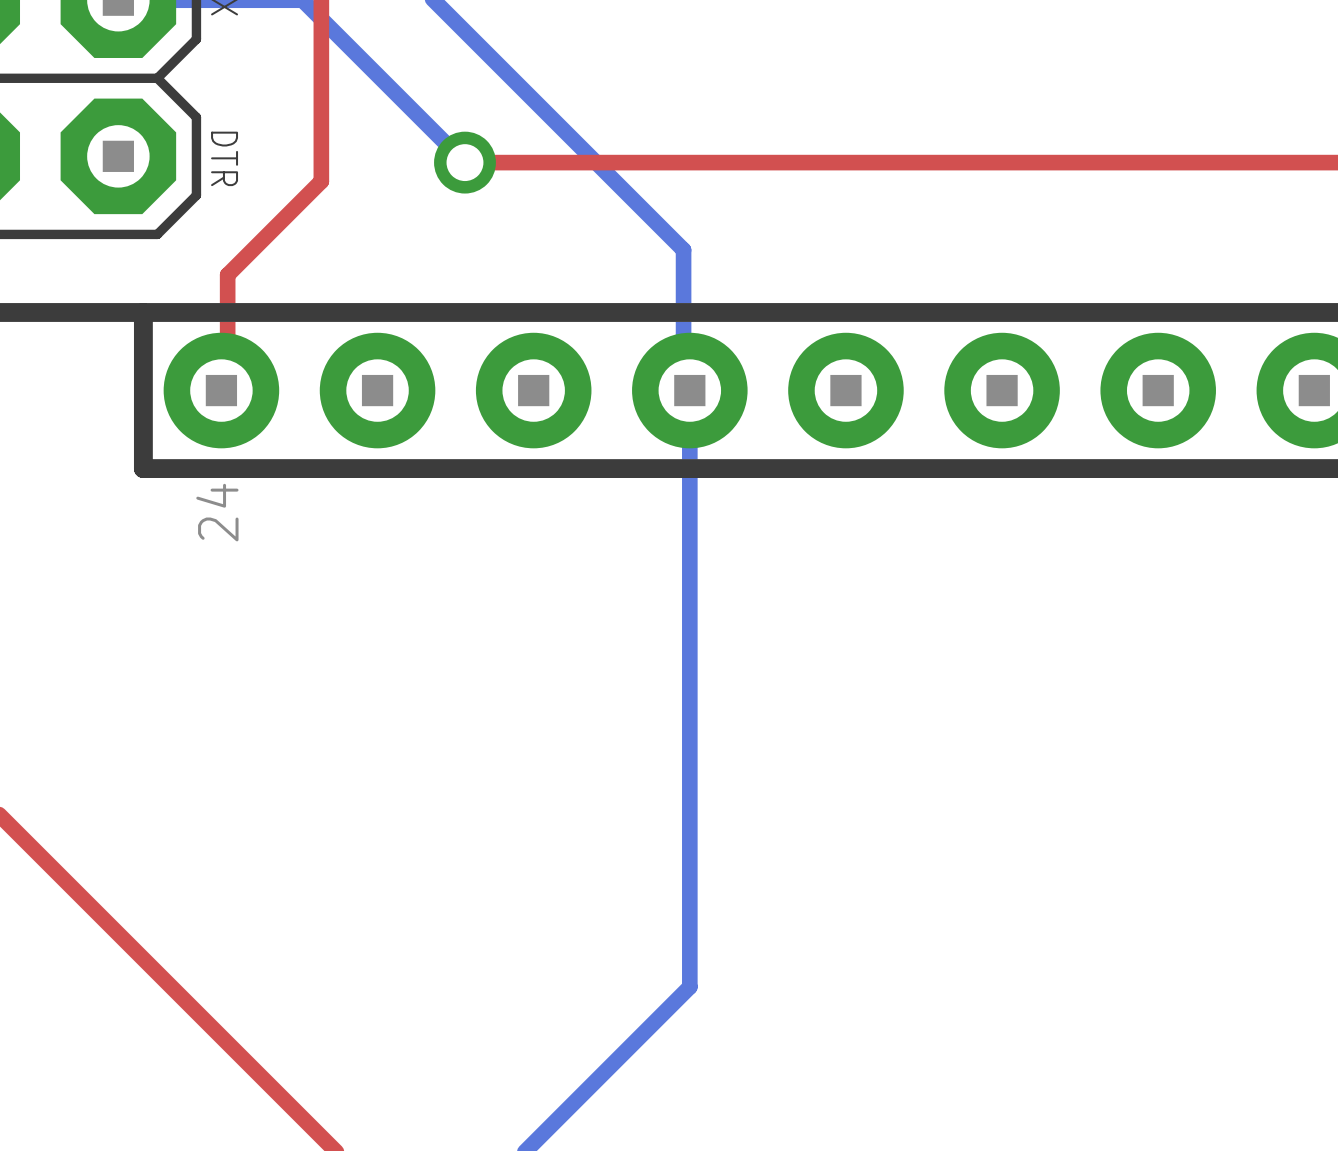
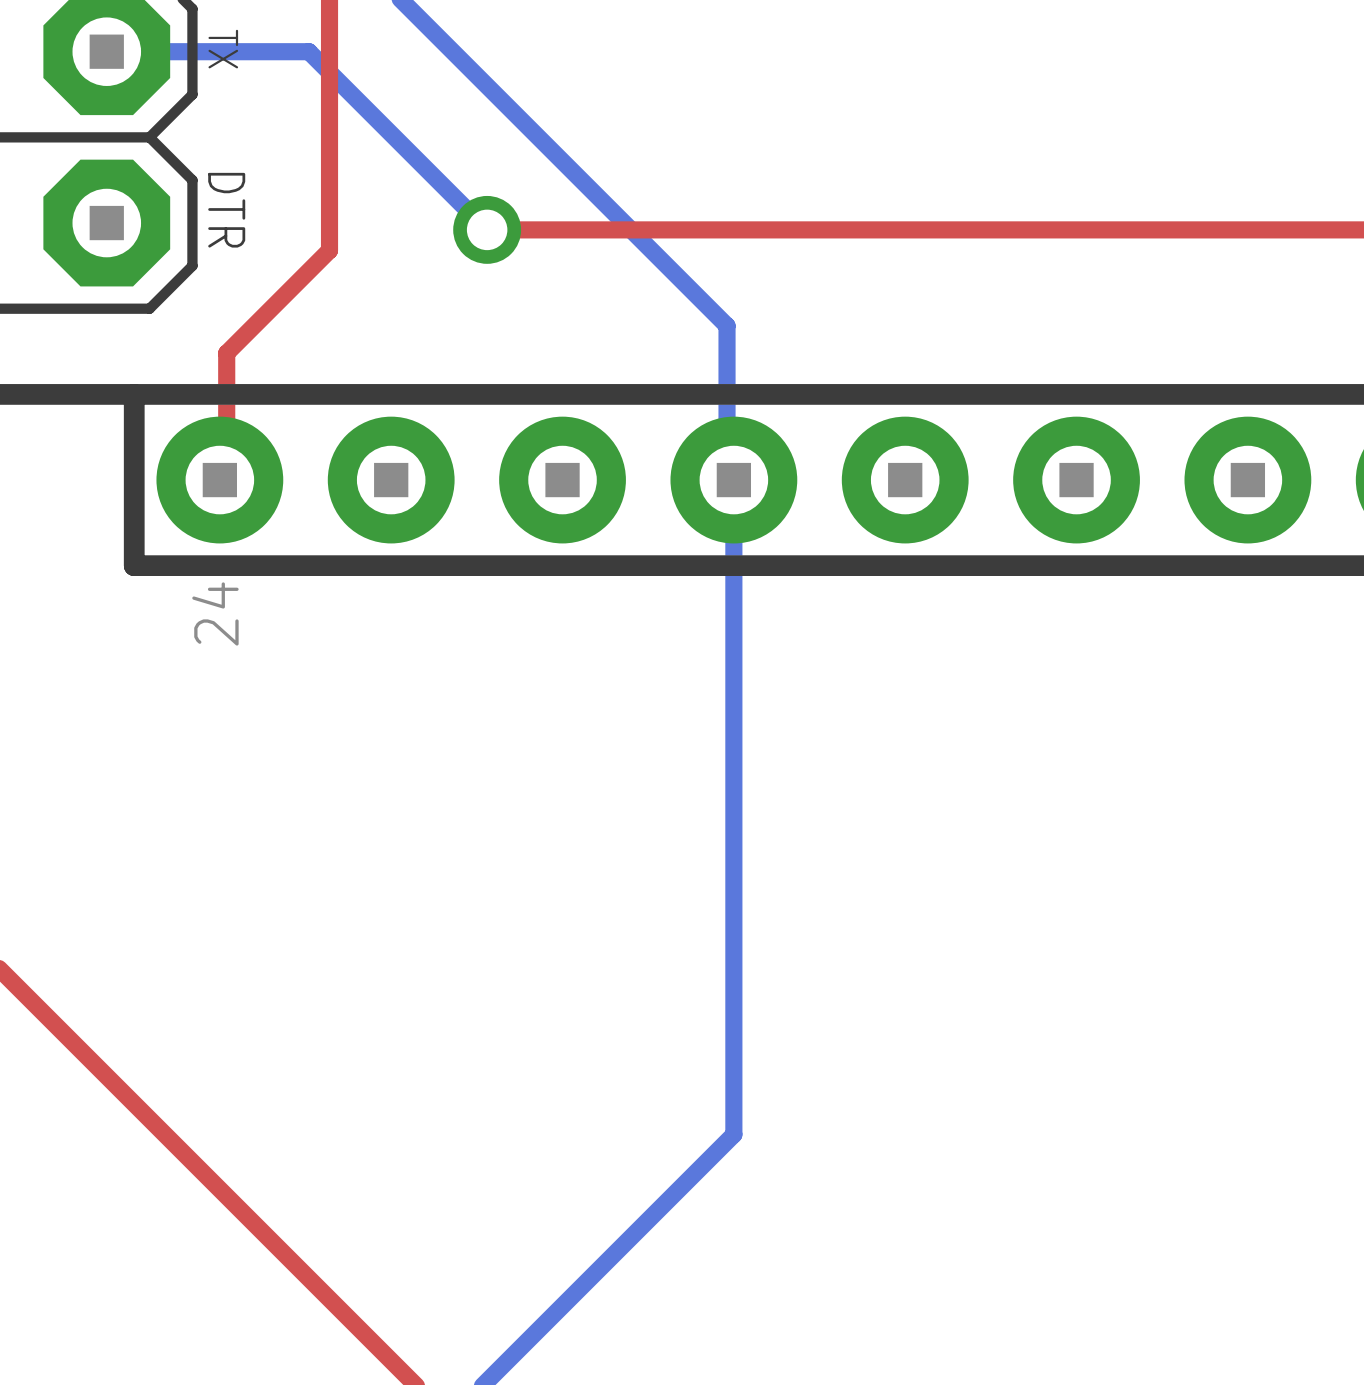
text position: DTR (224, 158) -> DTR (226, 210)

